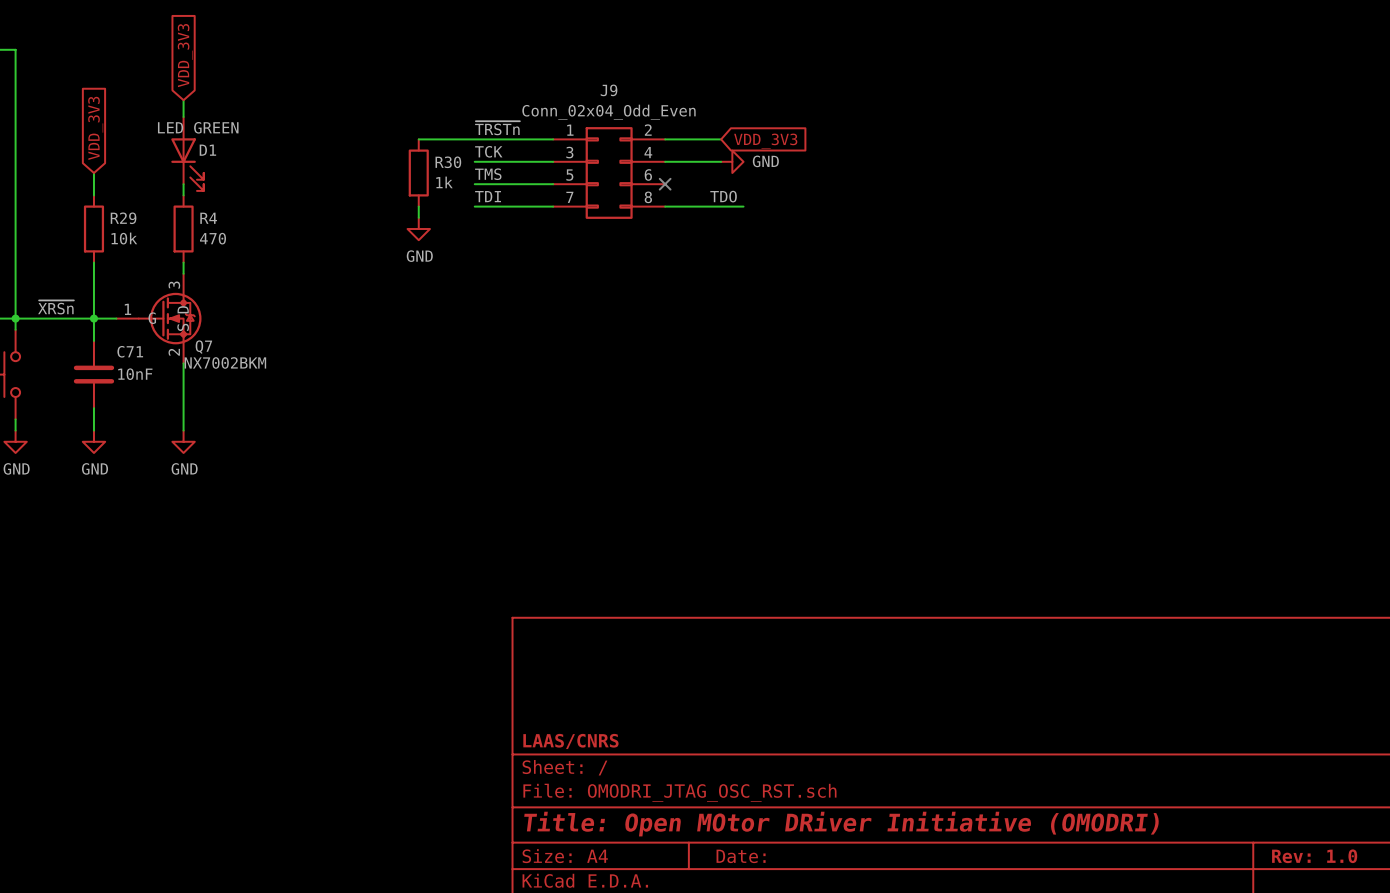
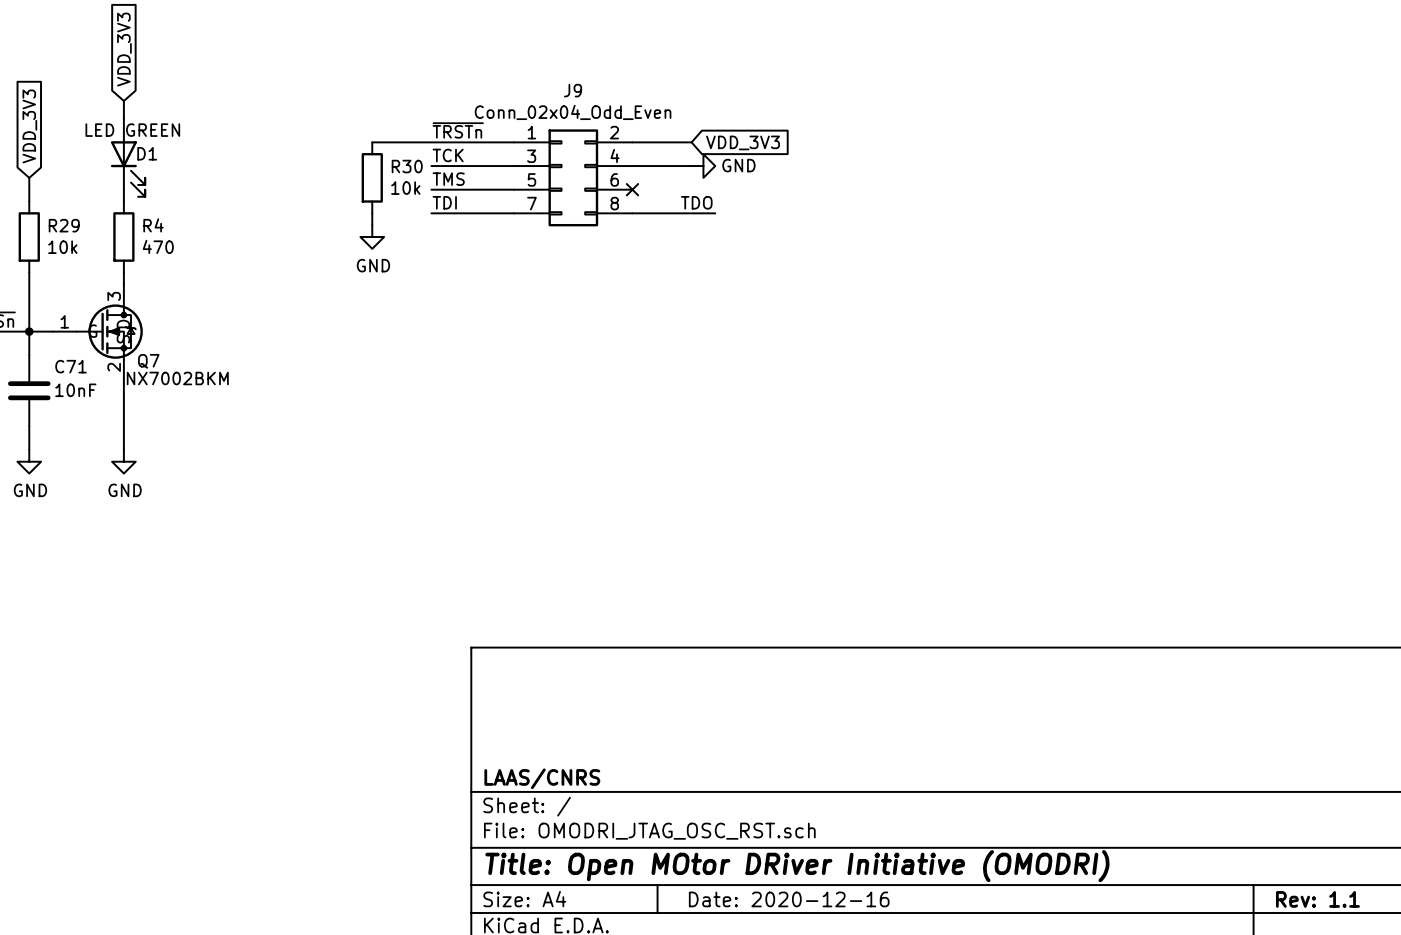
R30 value: 1k (444, 182) -> 10k (405, 188)
title block: Date: (741, 856) -> Date: 2020-12-16 (789, 899)
title block: Rev: 1.0 (1314, 856) -> Rev: 1.1 (1317, 899)

